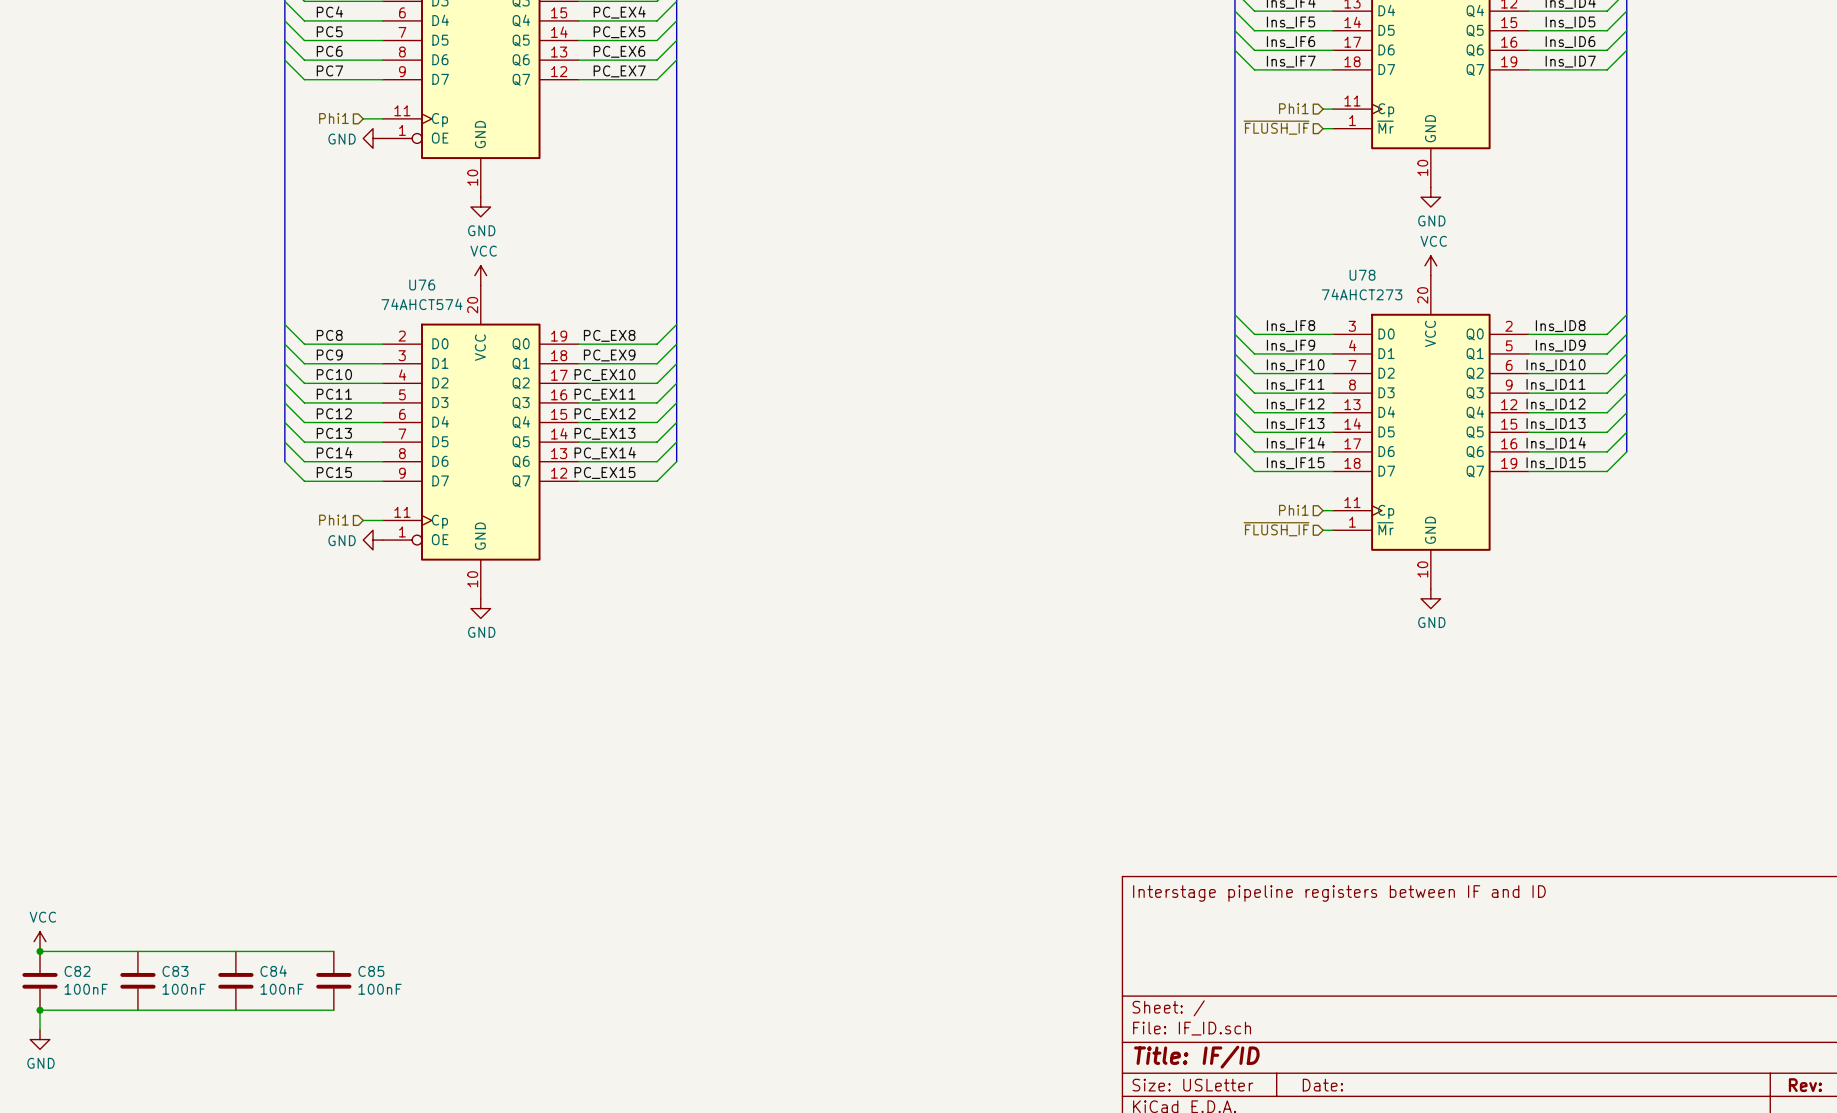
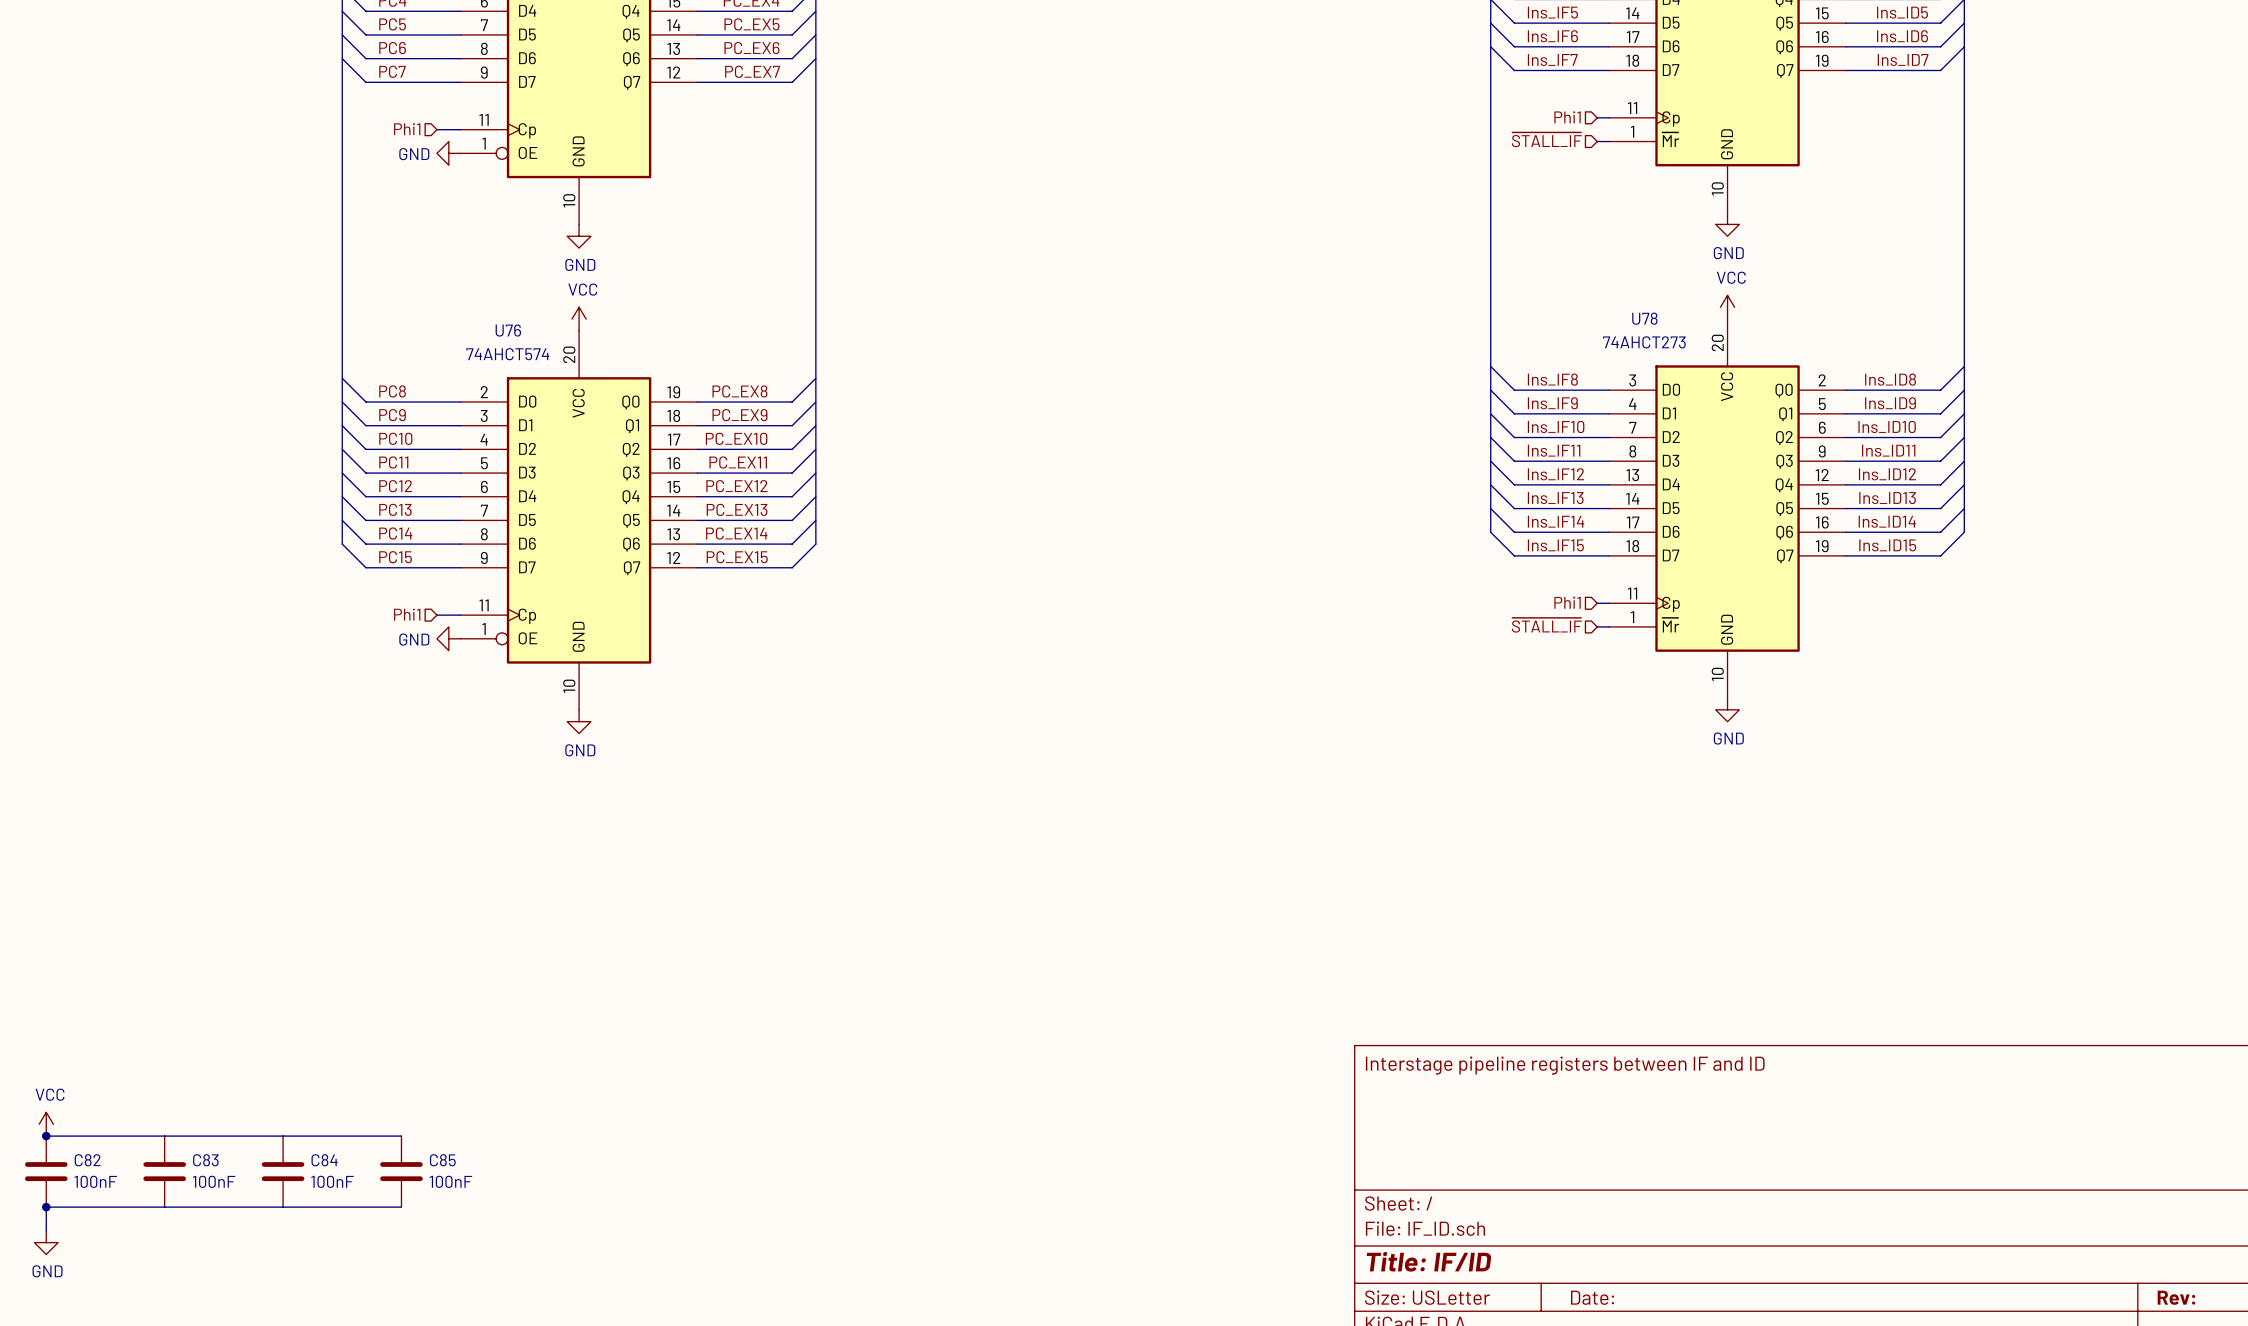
hierarchical label: ~{FLUSH_IF} (1276, 127) -> ~{STALL_IF} (1546, 139)
hierarchical label: ~{FLUSH_IF} (1276, 529) -> ~{STALL_IF} (1546, 625)

